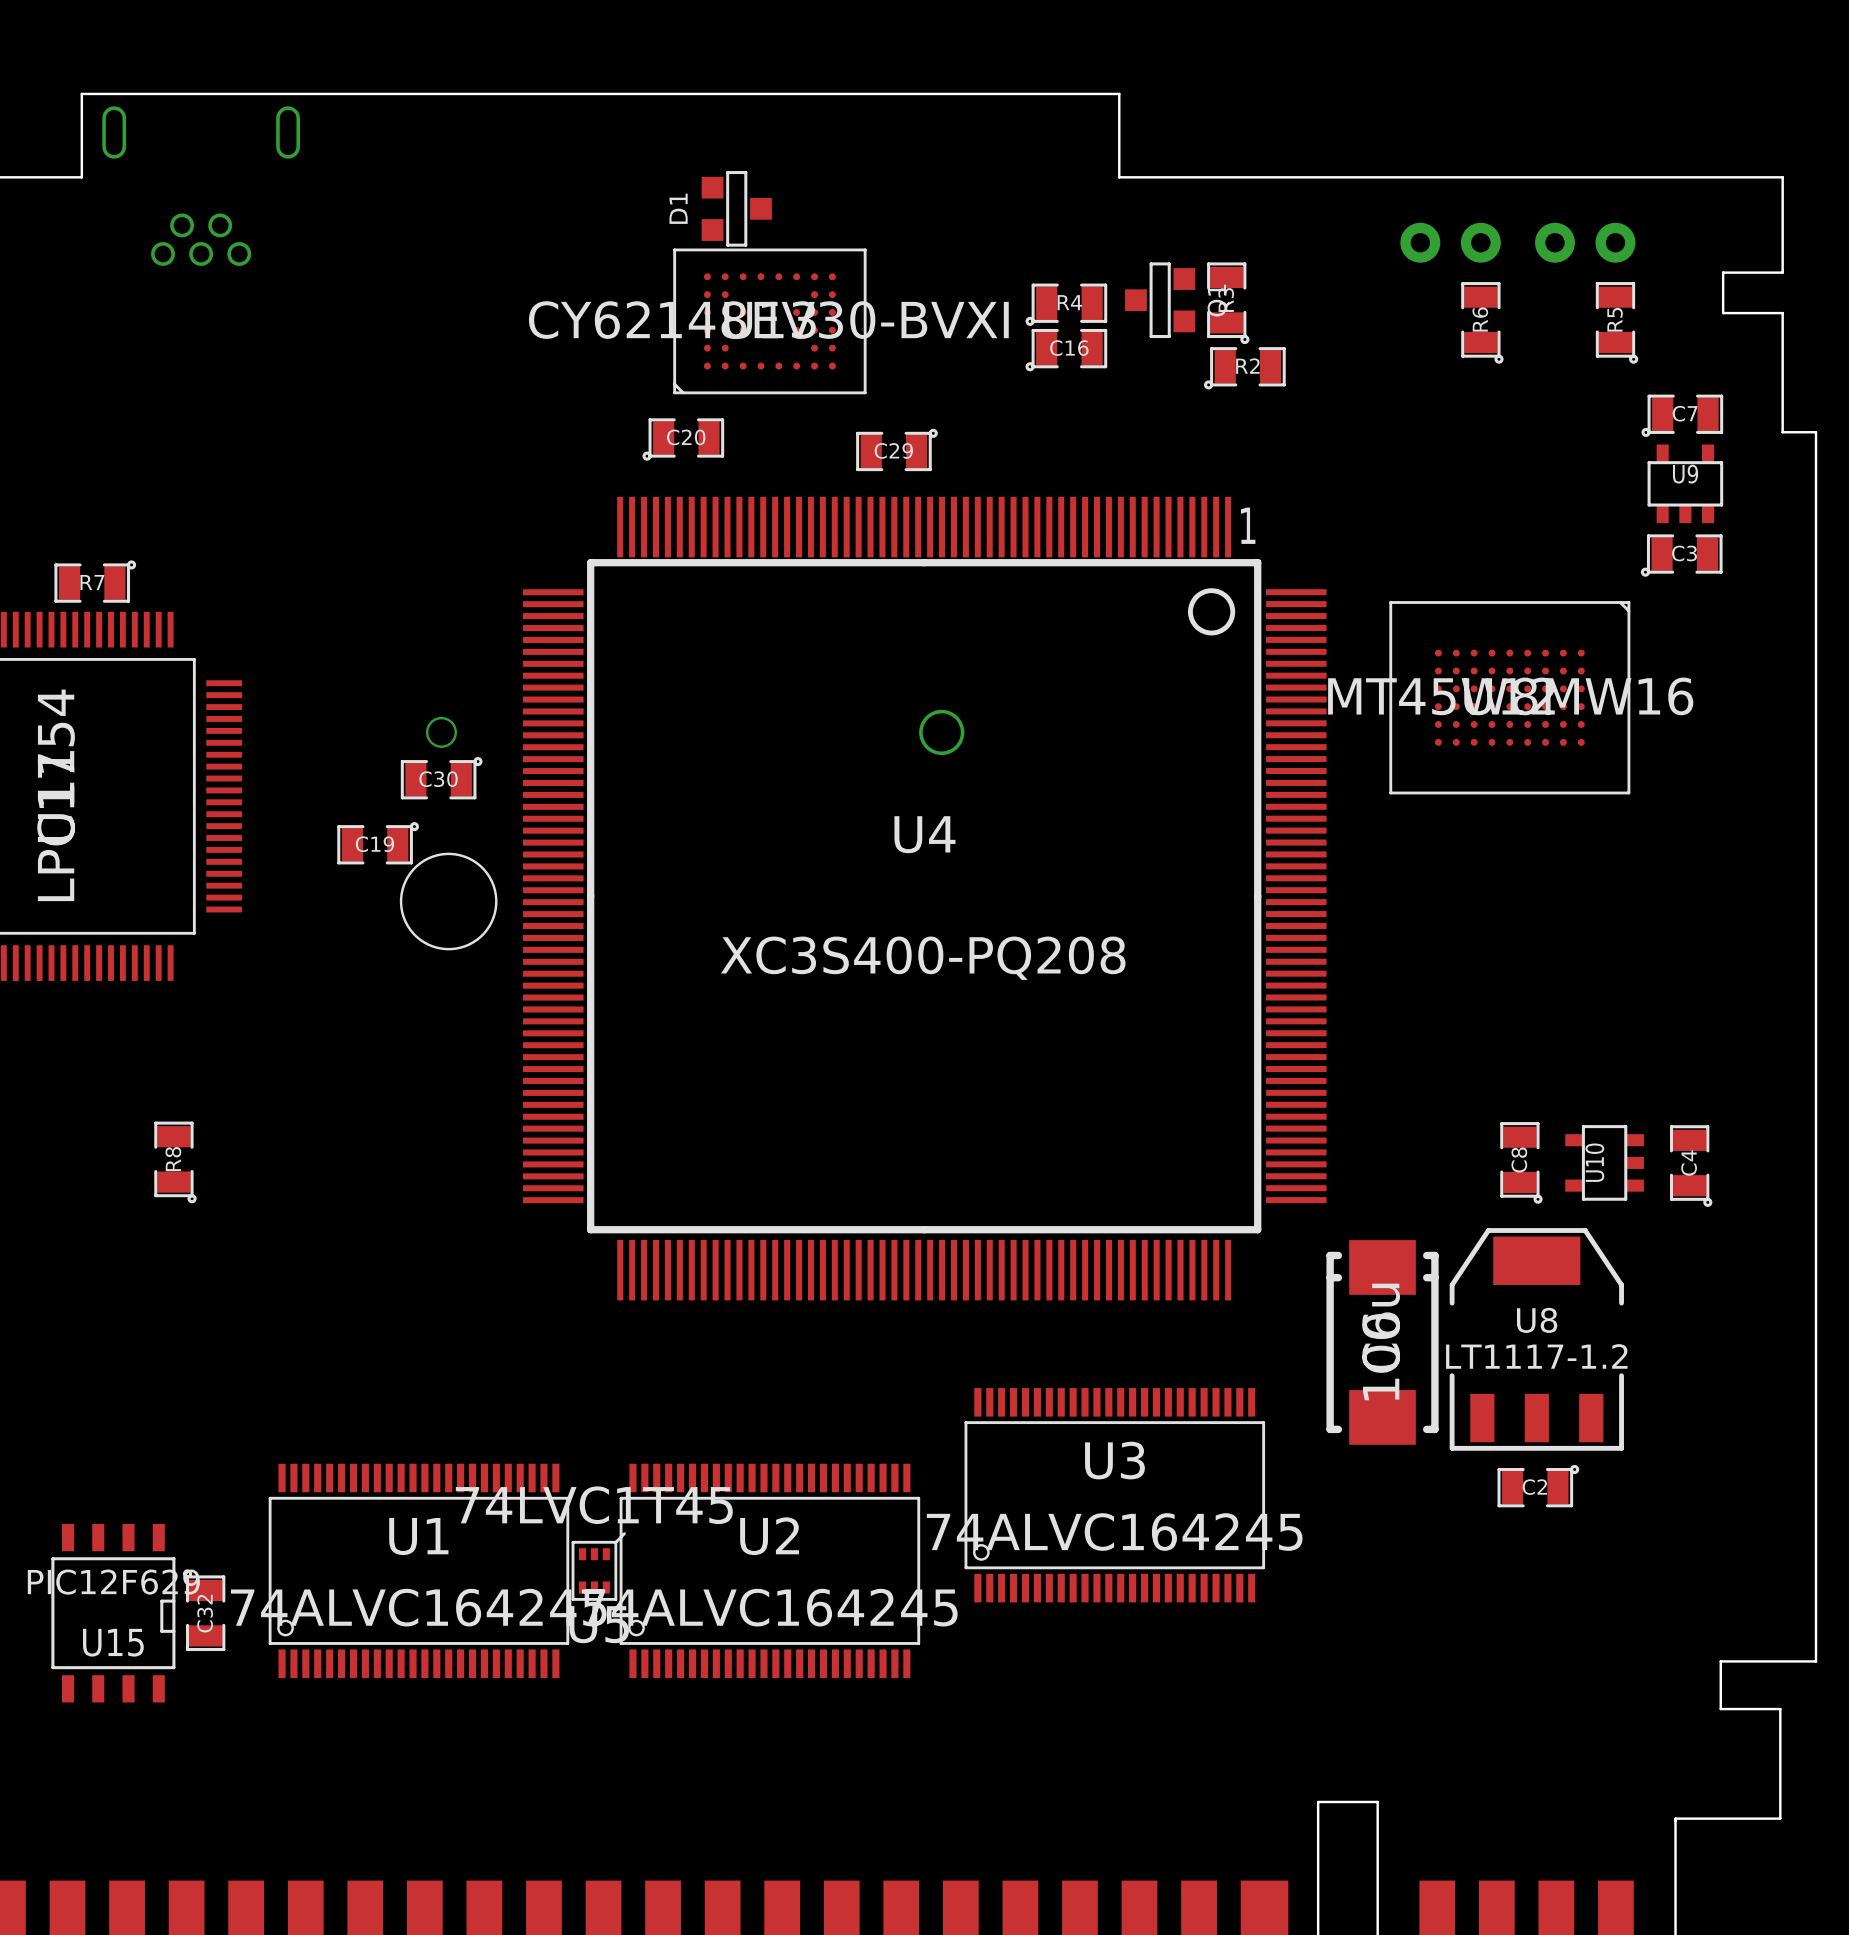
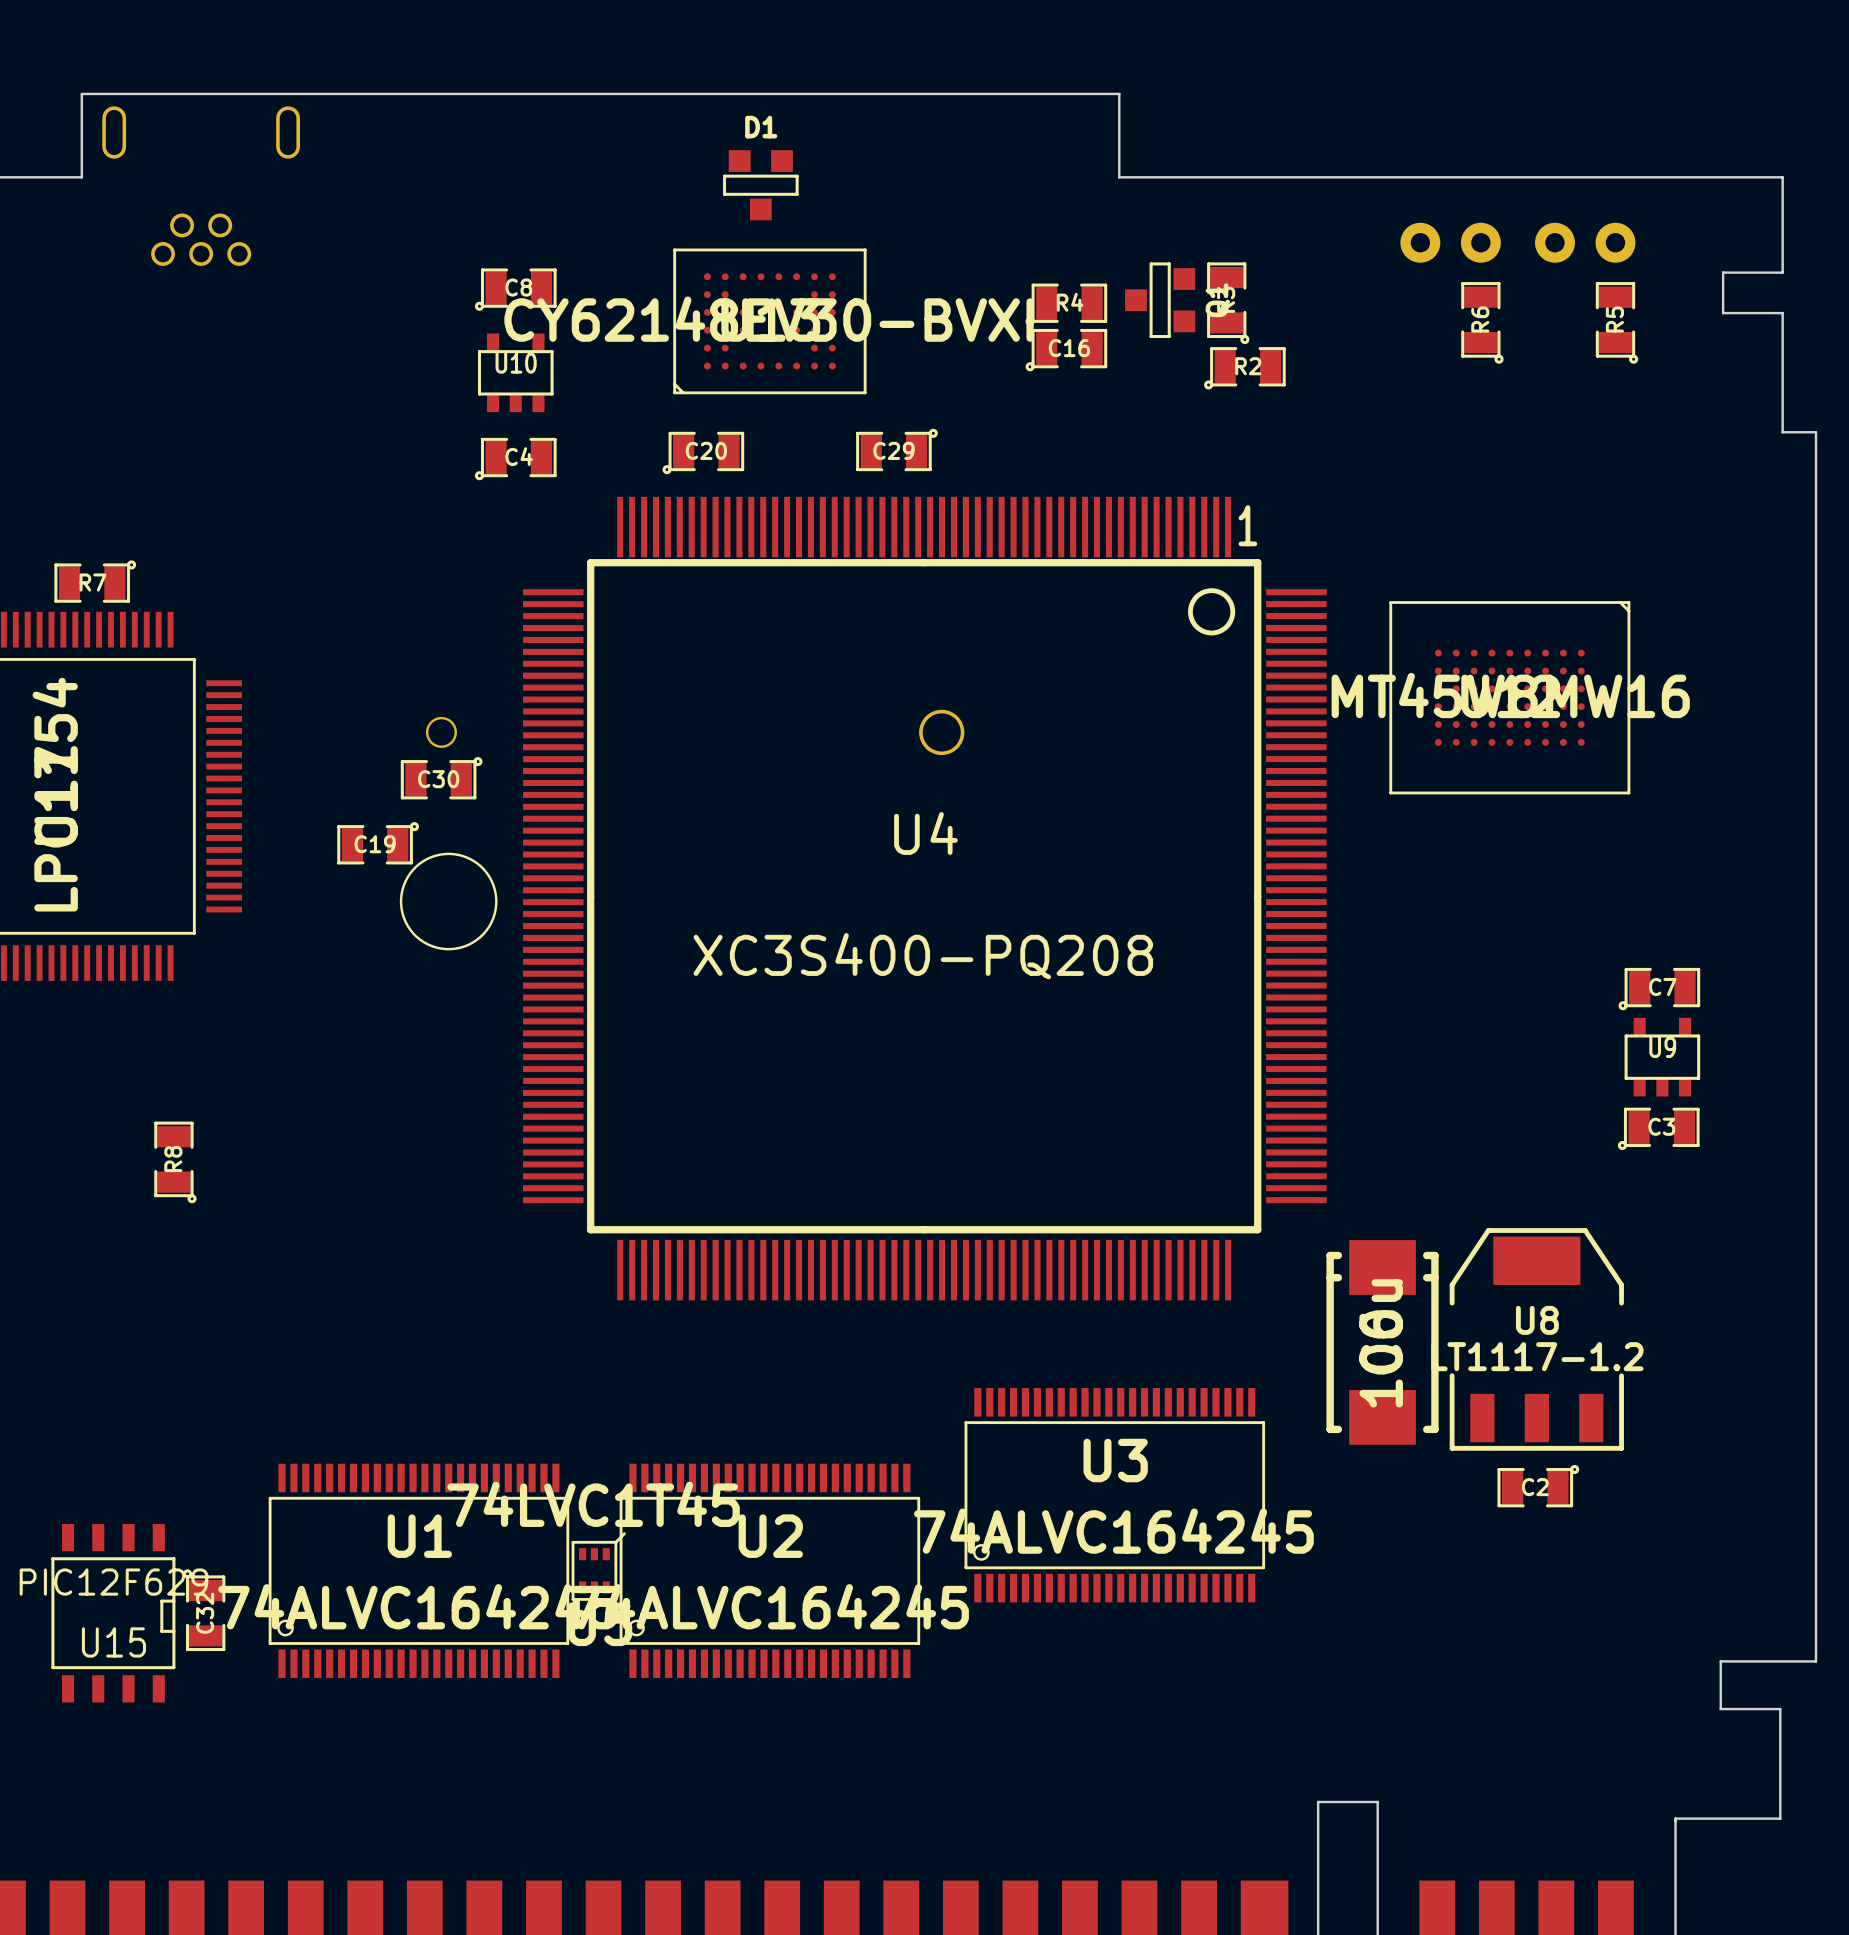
D1 rotation: 0° (736, 208) -> 90° clockwise (760, 185)
C7 position: (1682, 415) -> (1659, 989)
C20 position: (683, 439) -> (703, 452)
U9 position: (1685, 483) -> (1662, 1057)
C3 position: (1681, 555) -> (1658, 1128)
C8 rotation: 0° (1521, 1162) -> 90° clockwise (515, 289)
C8 position: (1521, 1162) -> (515, 289)
U10 rotation: 0° (1604, 1162) -> 90° clockwise (515, 372)
U10 position: (1604, 1162) -> (515, 372)
C4 rotation: 0° (1691, 1166) -> 90° clockwise (515, 459)
C4 position: (1691, 1166) -> (515, 459)

